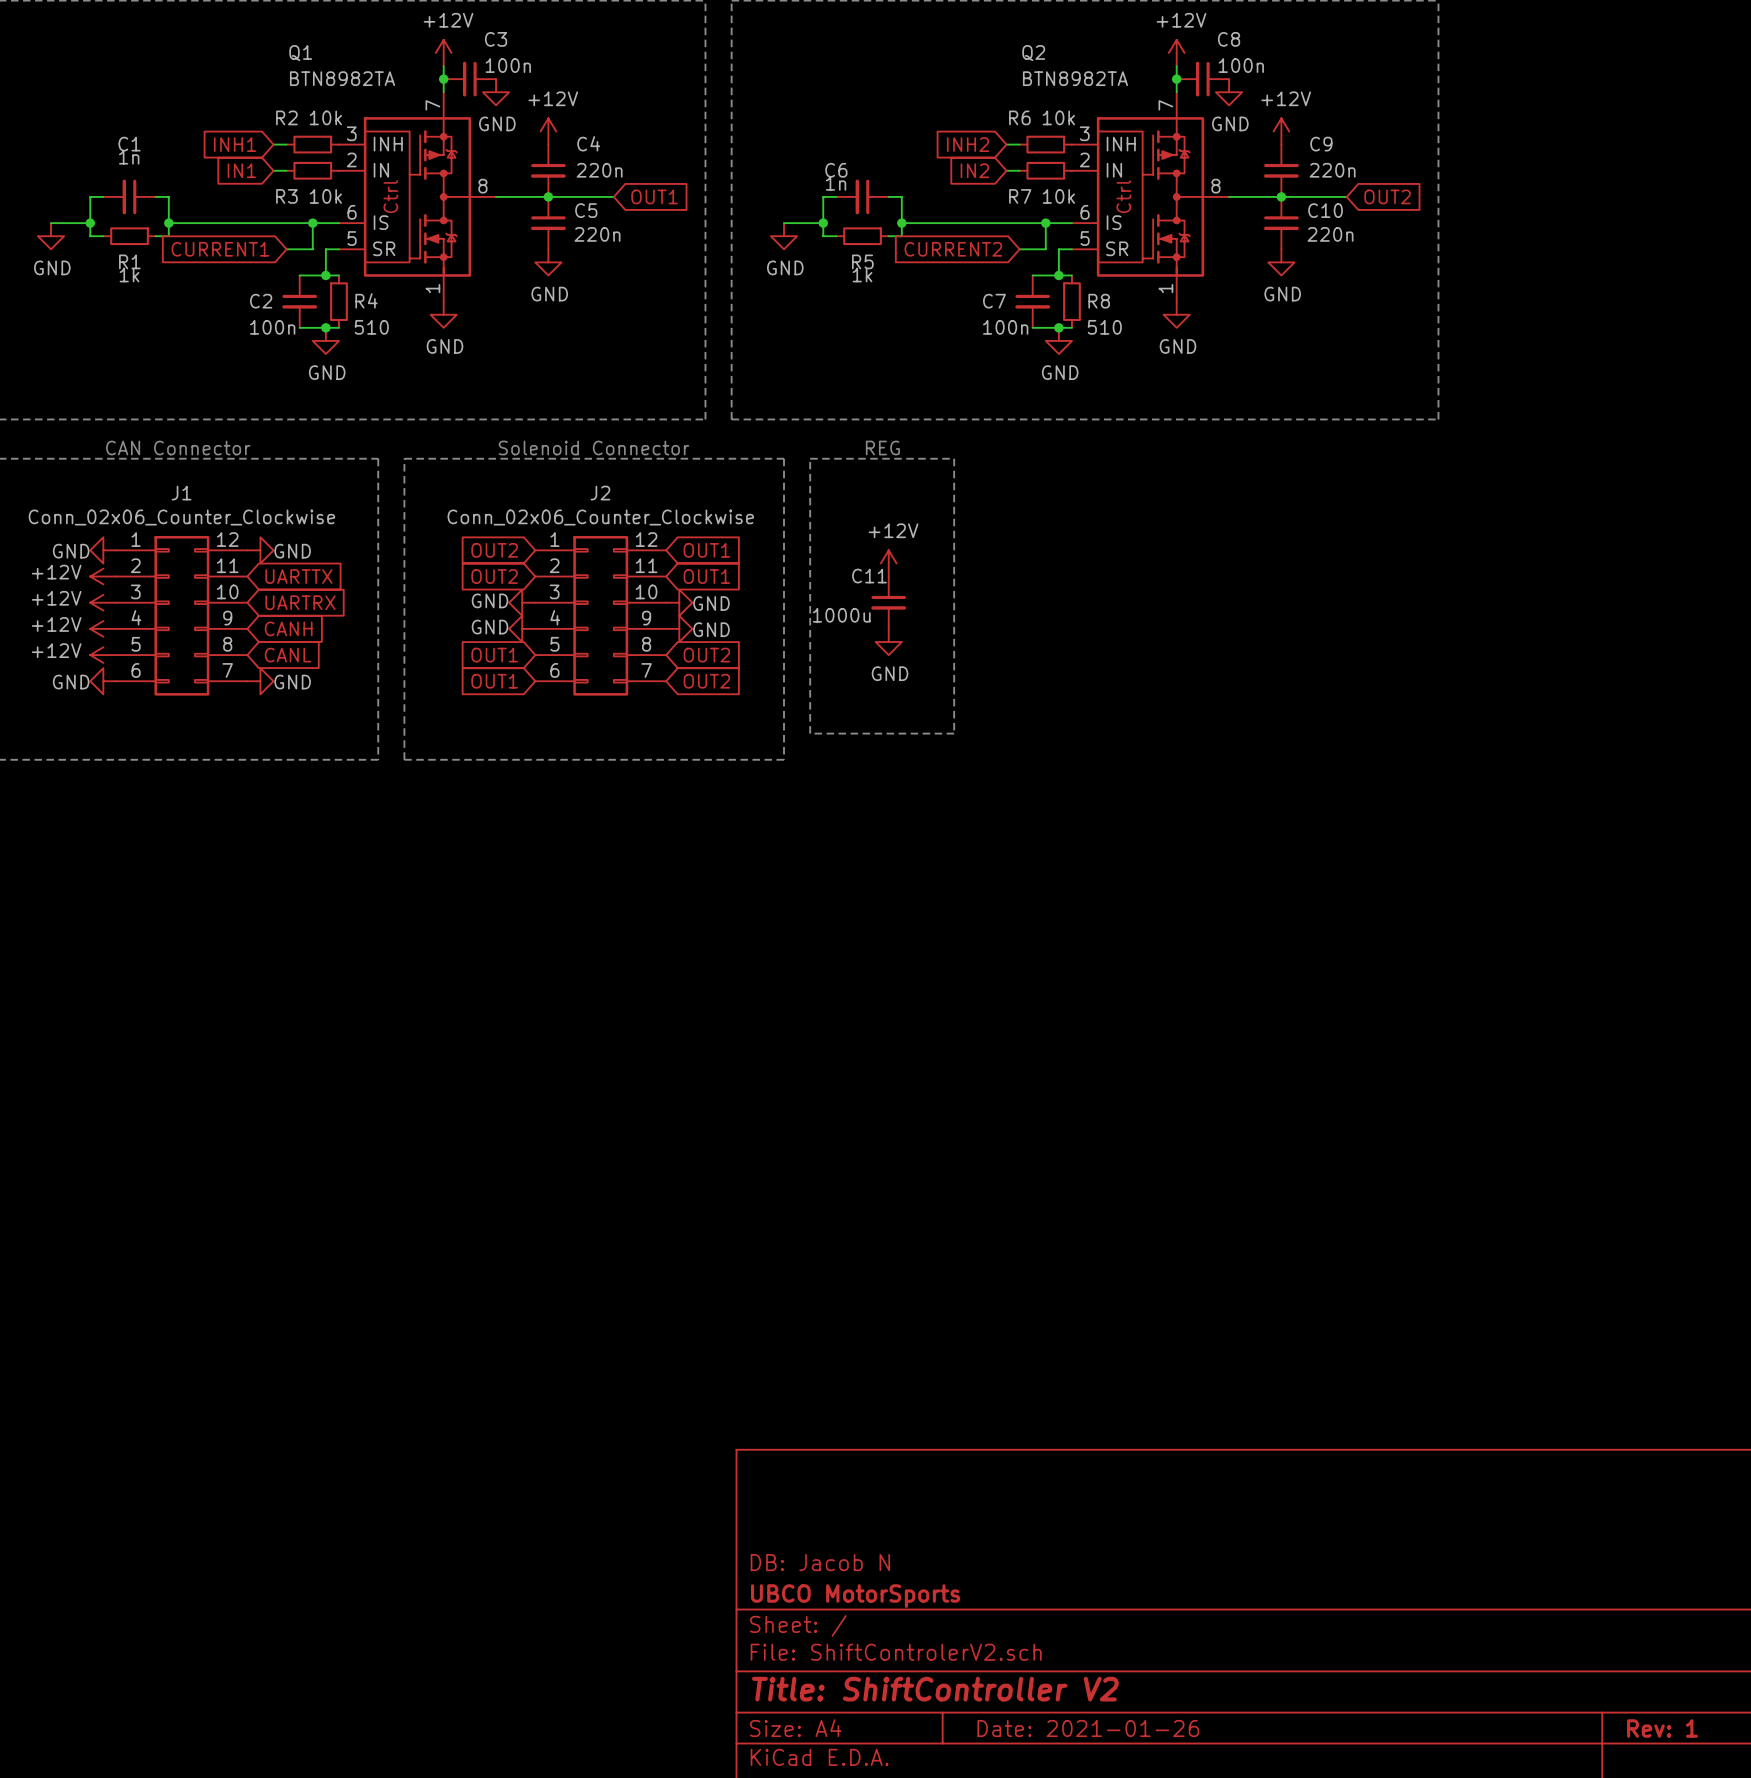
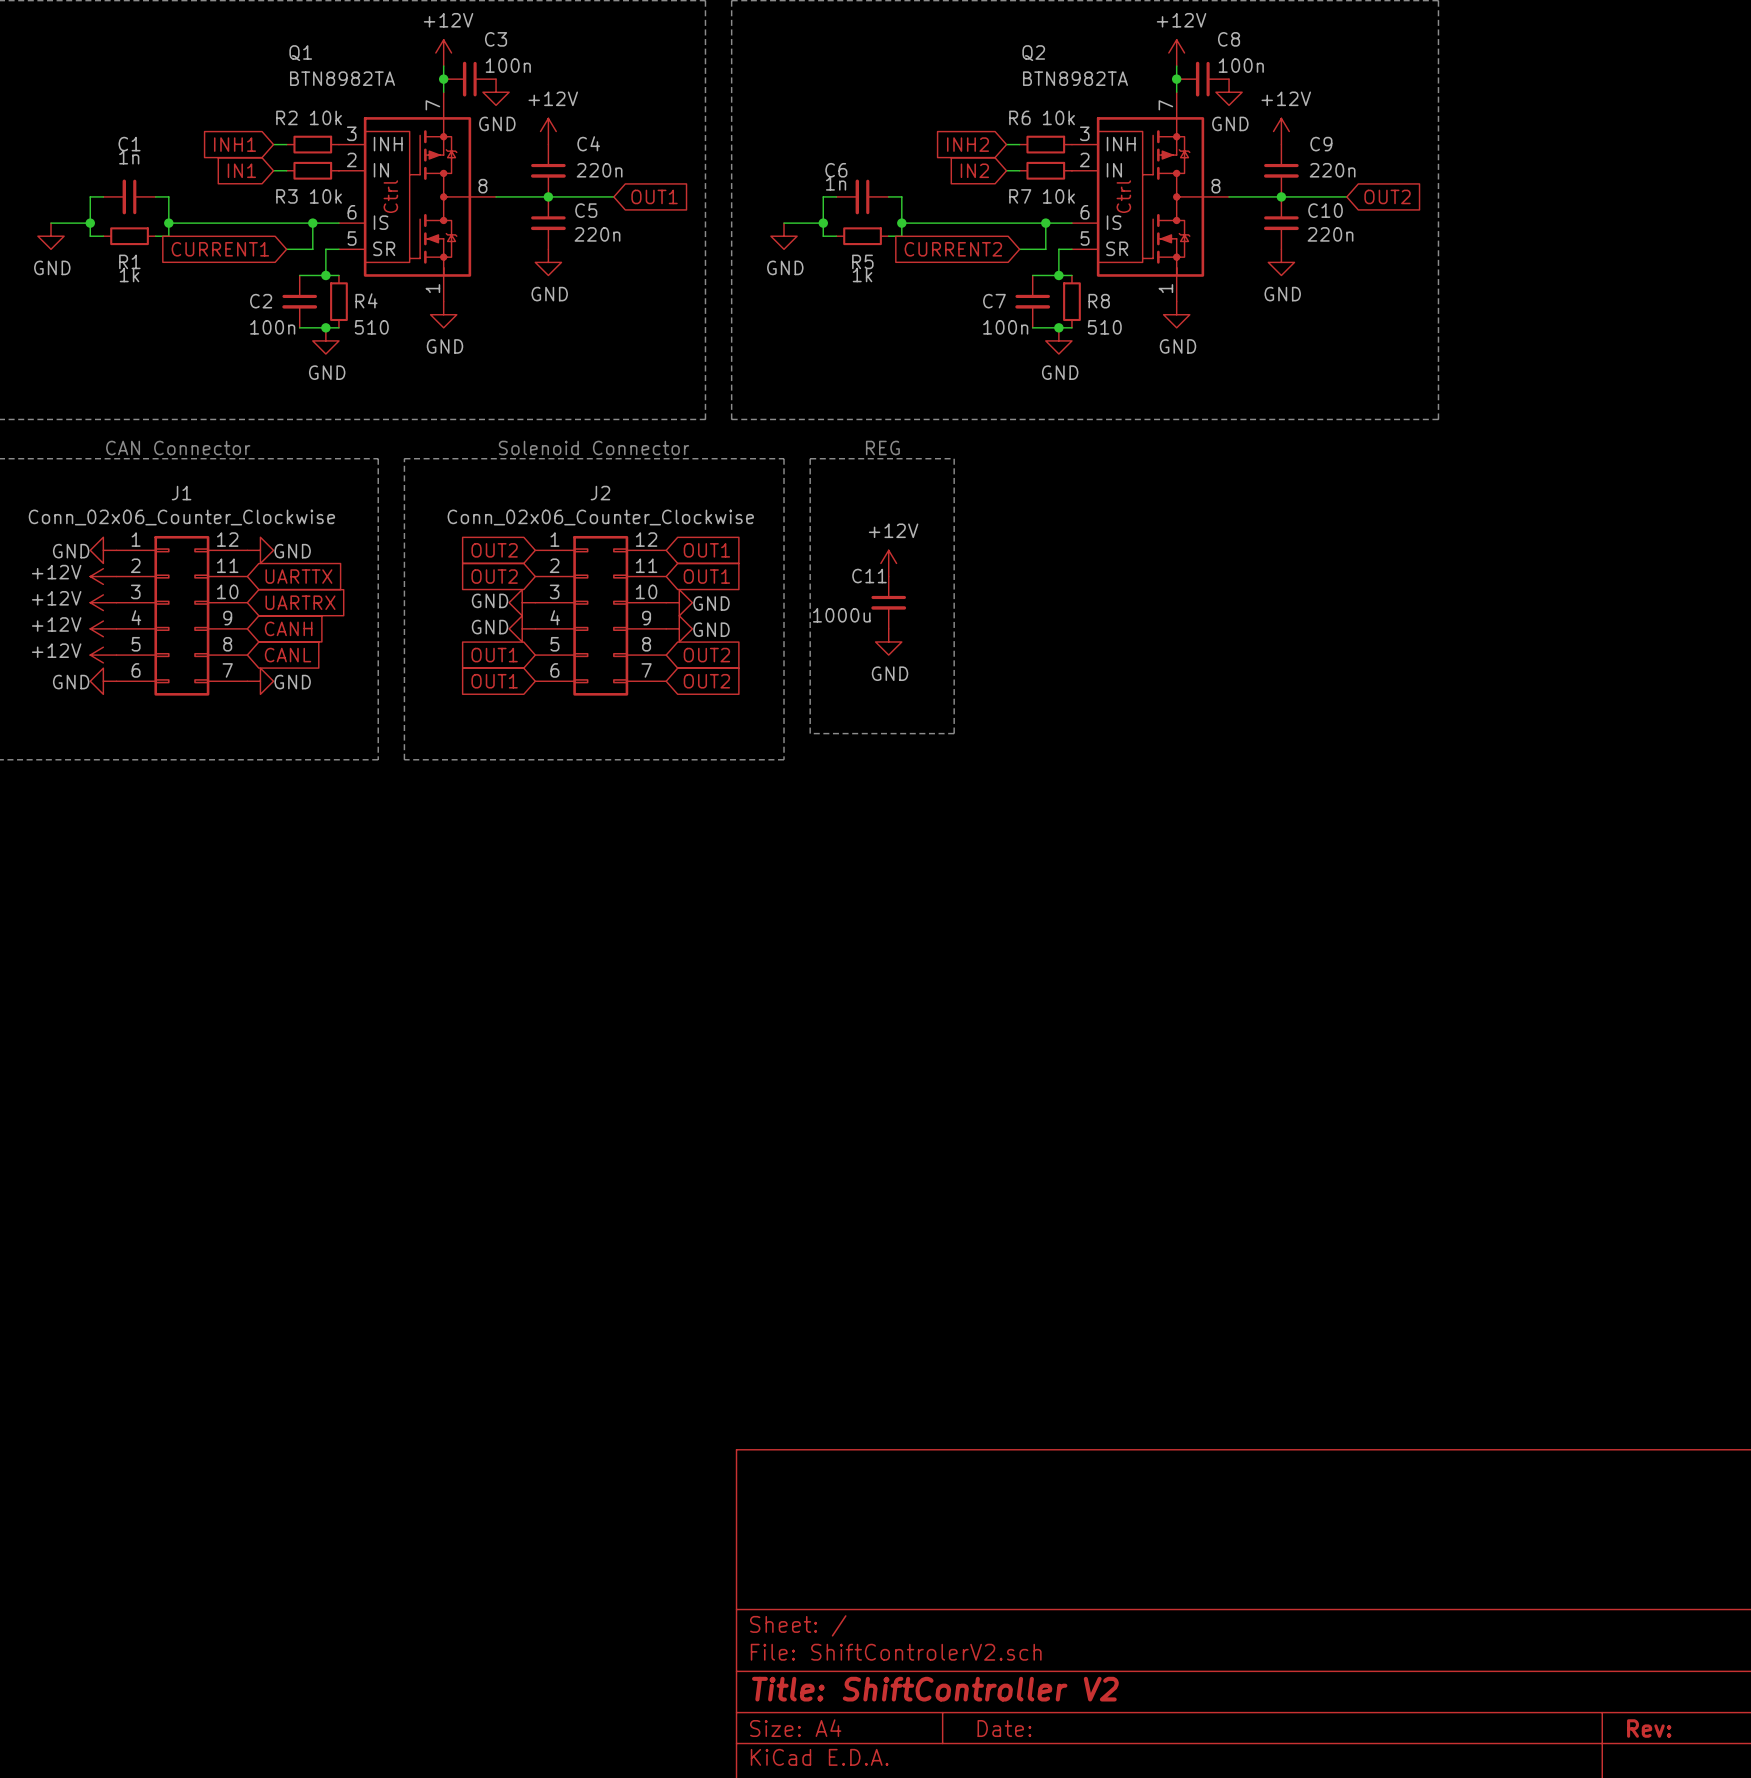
title block: DB: Jacob N (820, 1562) -> none
title block: UBCO MotorSports (855, 1596) -> none
title block: Date: 2021-01-26 (1088, 1728) -> Date: (1004, 1728)
title block: Rev: 1 (1662, 1728) -> Rev: (1649, 1728)

